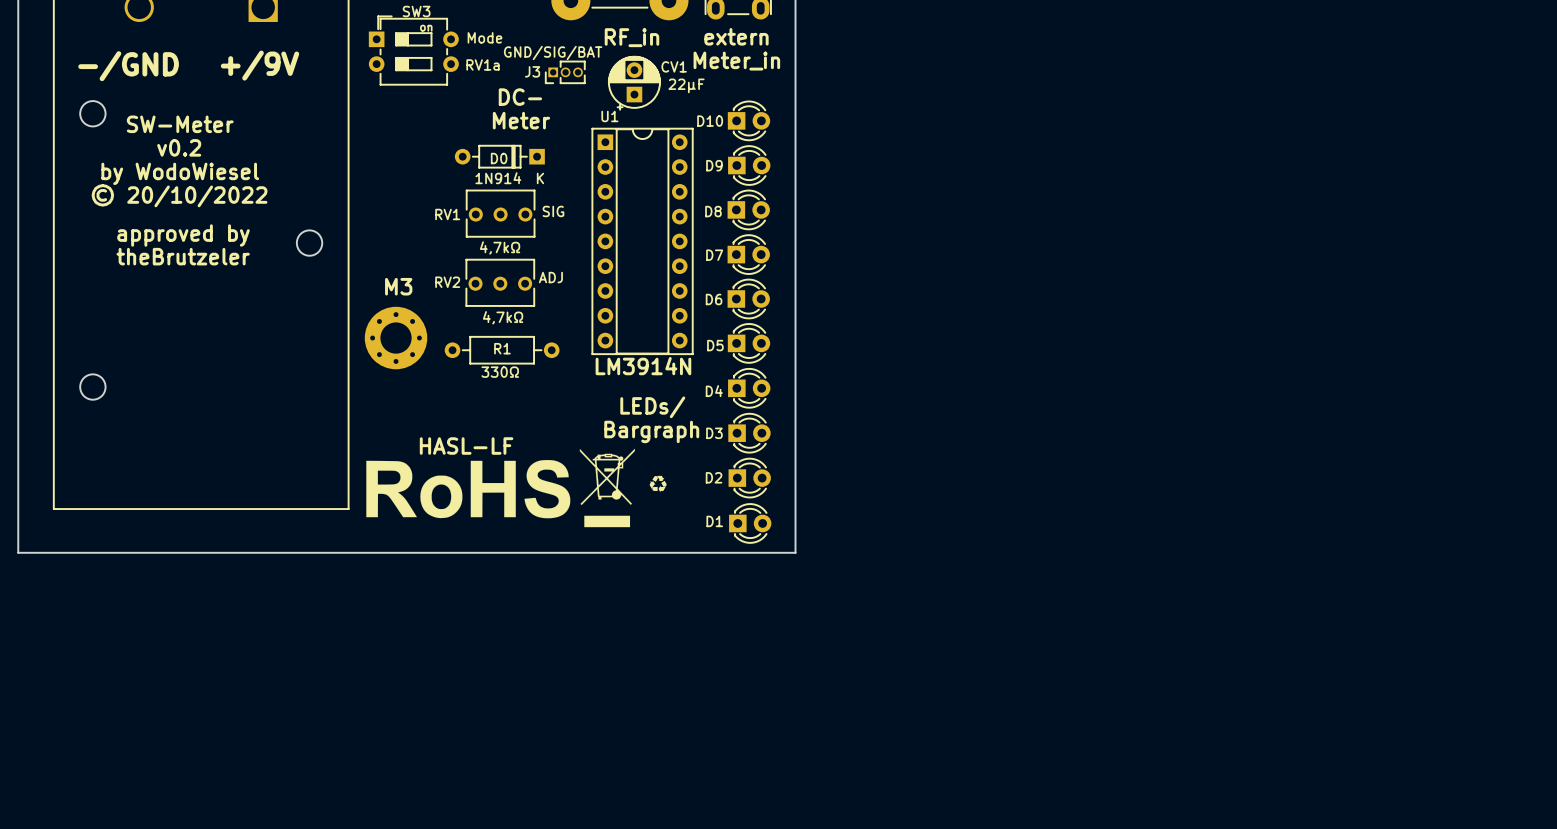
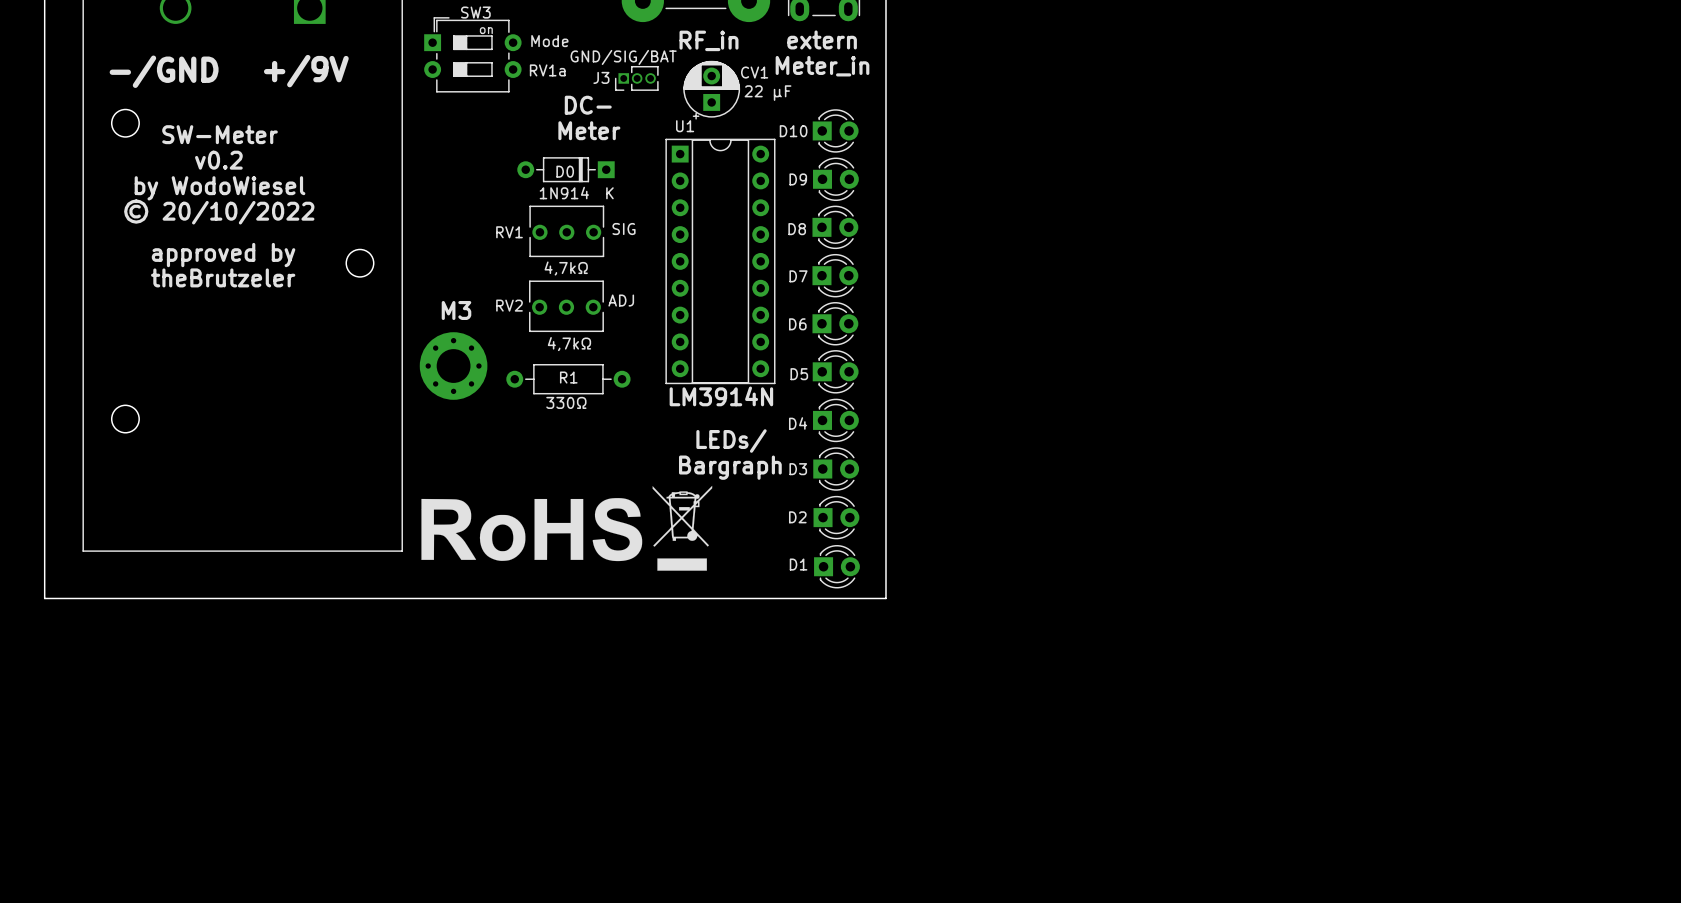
CV1 value: 22µF (686, 85) -> 22 µF (768, 93)
text: HASL-LF (466, 446) -> none
drawing: [649, 475, 667, 493] -> none

